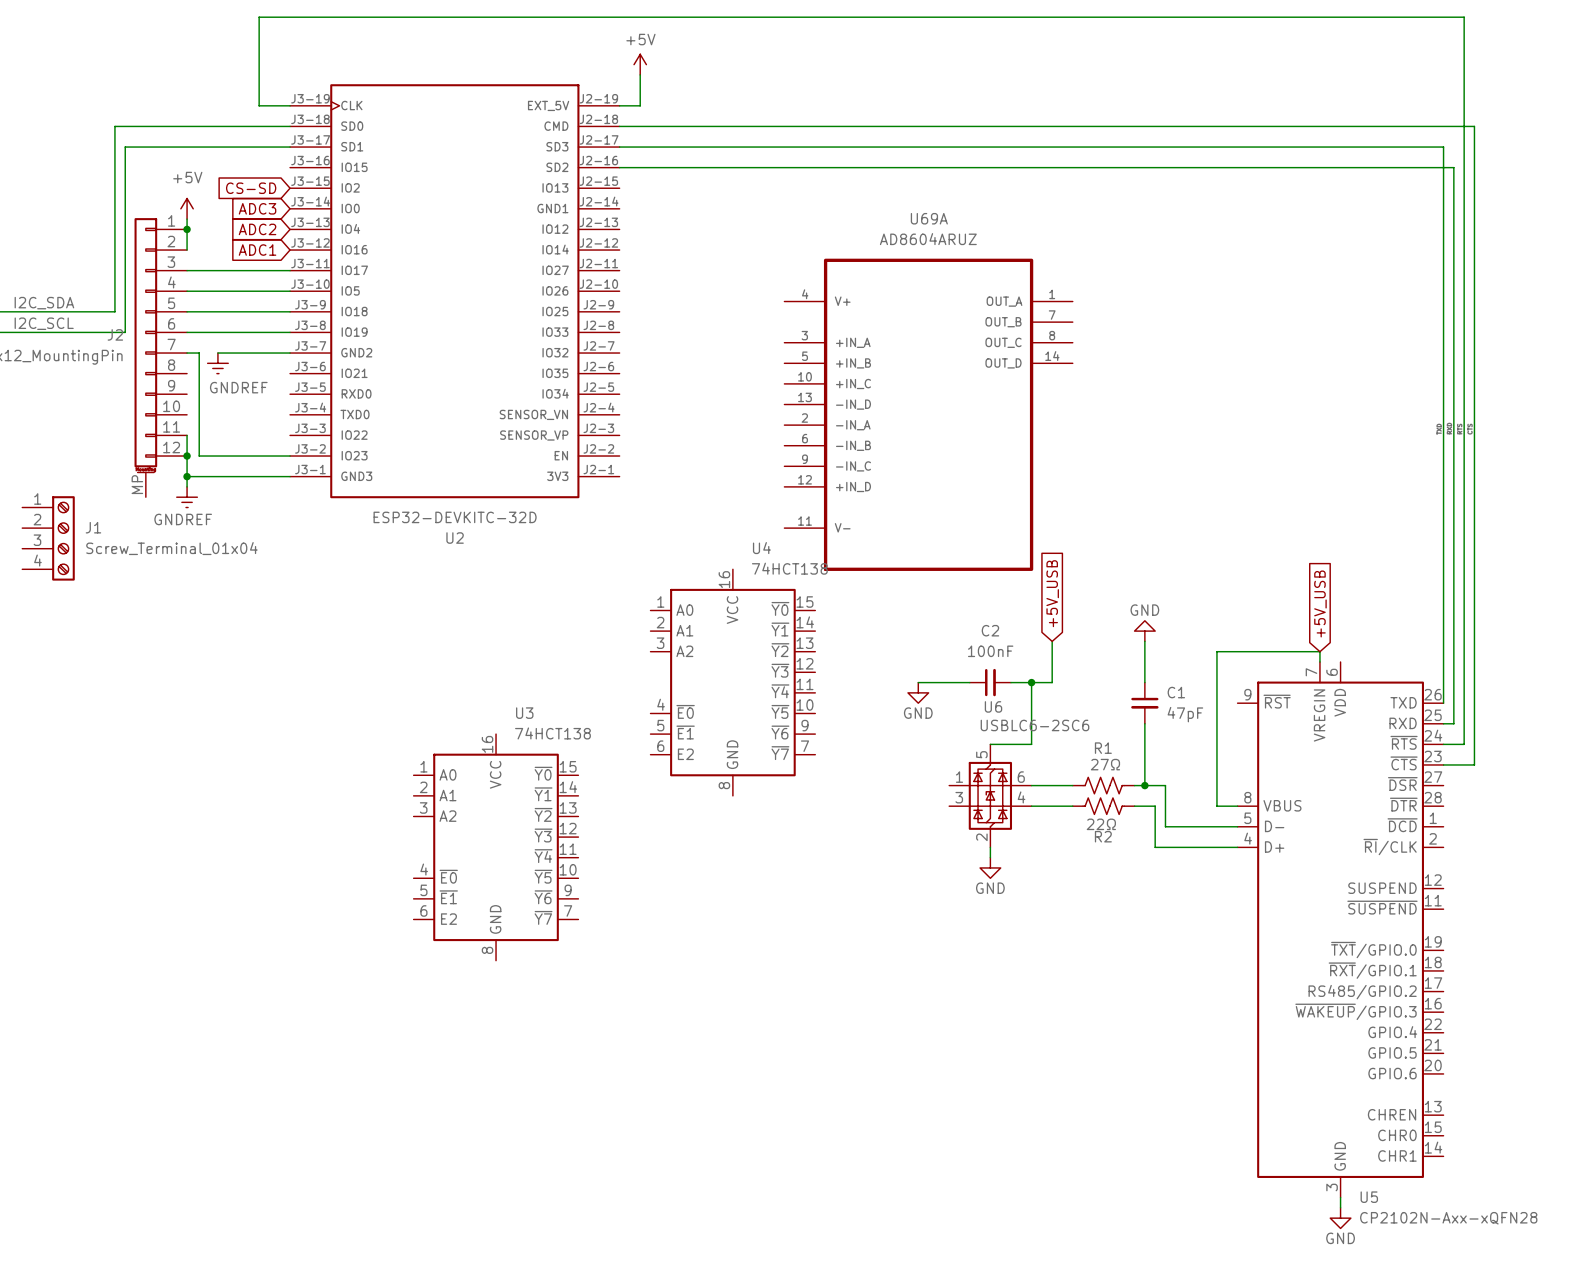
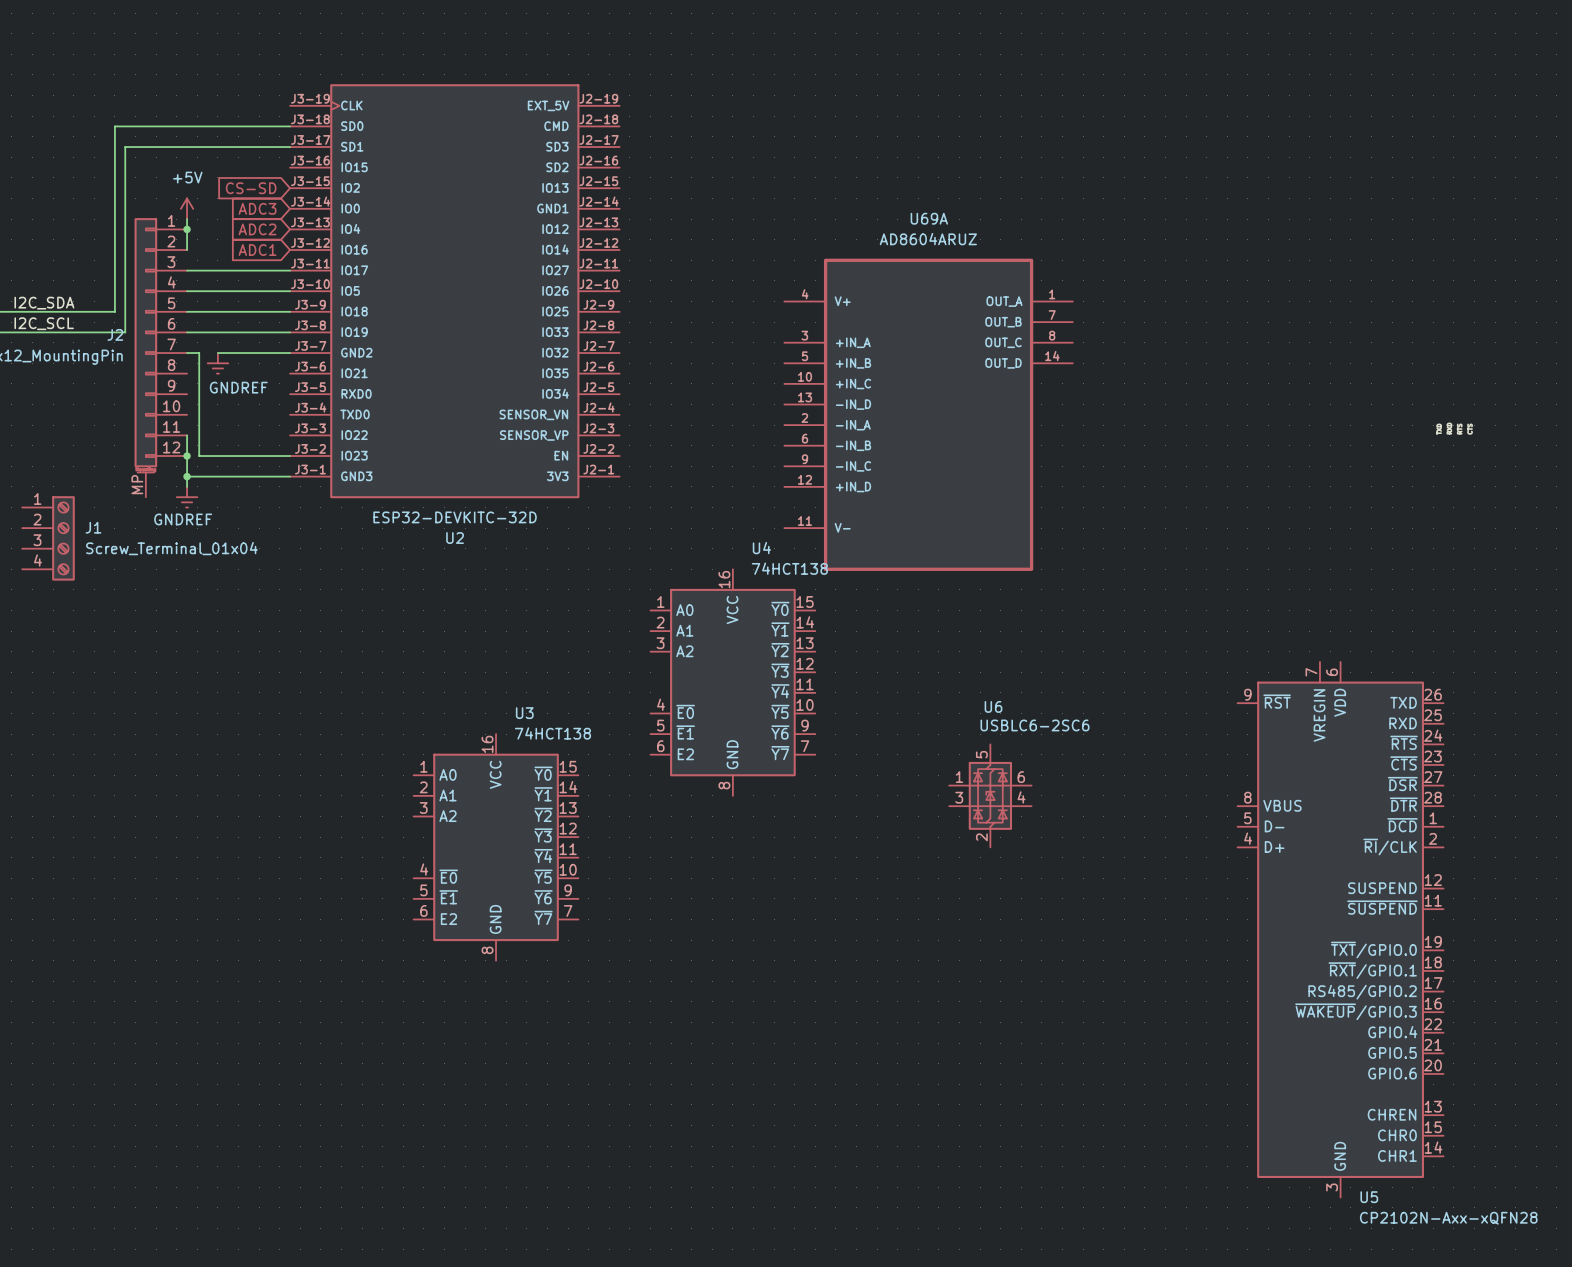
power symbol: +5V (640, 64) -> none
wire: (640, 74) (640, 105) (619, 105) -> none
wire: (290, 105) (259, 105) (259, 17) (1464, 17) (1464, 744) (1443, 744) -> none
wire: (619, 126) (1474, 126) (1474, 764) (1443, 764) -> none
wire: (619, 147) (1443, 147) (1443, 703) -> none
wire: (619, 167) (1453, 167) (1453, 723) (1443, 723) -> none
global label: +5V_USB (1052, 593) -> none
global label: +5V_USB (1320, 603) -> none
power symbol: GND (1144, 631) -> none
wire: (1052, 641) (1052, 682) (1010, 682) -> none
wire: (1144, 641) (1144, 682) -> none
wire: (1319, 661) (1319, 651) (1216, 651) (1216, 806) (1237, 806) -> none
wire: (918, 682) (969, 682) -> none
C2: 100nF (990, 682) -> none
wire: (1031, 682) (1031, 744) (990, 744) -> none
junction: (1031, 682) -> none
power symbol: GND (918, 692) -> none
C1: 47pF (1144, 703) -> none
wire: (1144, 723) (1144, 785) -> none
wire: (1031, 785) (1072, 785) -> none
R1: 27Ω (1103, 785) -> none
wire: (1134, 785) (1165, 785) (1165, 826) (1237, 826) -> none
junction: (1144, 785) -> none
wire: (1031, 806) (1072, 806) -> none
R2: 22Ω (1103, 806) -> none
wire: (1134, 806) (1155, 806) (1155, 847) (1237, 847) -> none
wire: (990, 847) (990, 857) -> none
power symbol: GND (990, 867) -> none
wire: (1340, 1197) (1340, 1207) -> none
power symbol: GND (1340, 1218) -> none

